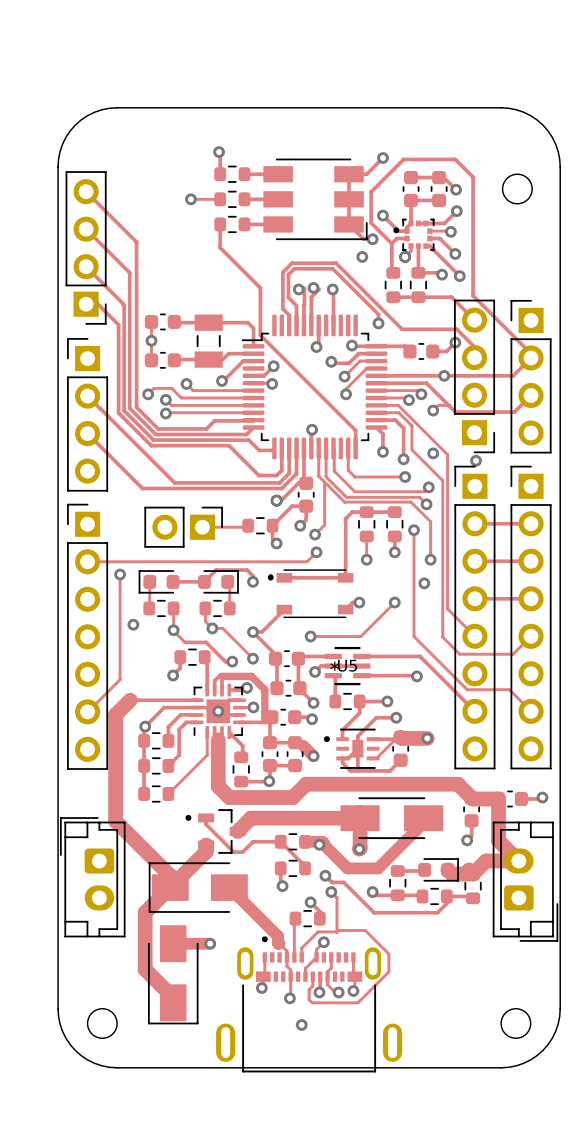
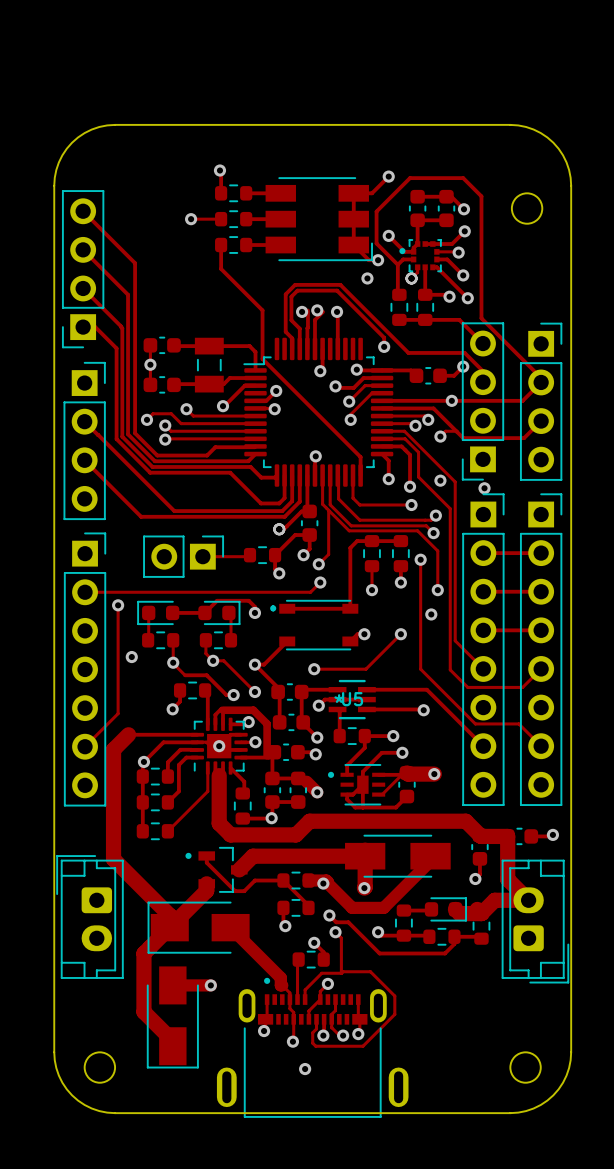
part footprint: [65, 171, 107, 325] -> [62, 190, 105, 349]
part footprint: [454, 299, 496, 454] -> [461, 322, 505, 481]
part footprint: [510, 299, 552, 454] -> [520, 322, 563, 481]
part footprint: [67, 338, 109, 492] -> [63, 361, 106, 521]
part footprint: [454, 465, 496, 770] -> [462, 493, 505, 806]
part footprint: [510, 465, 552, 770] -> [520, 493, 563, 806]
part footprint: [67, 503, 109, 770] -> [63, 532, 107, 807]

